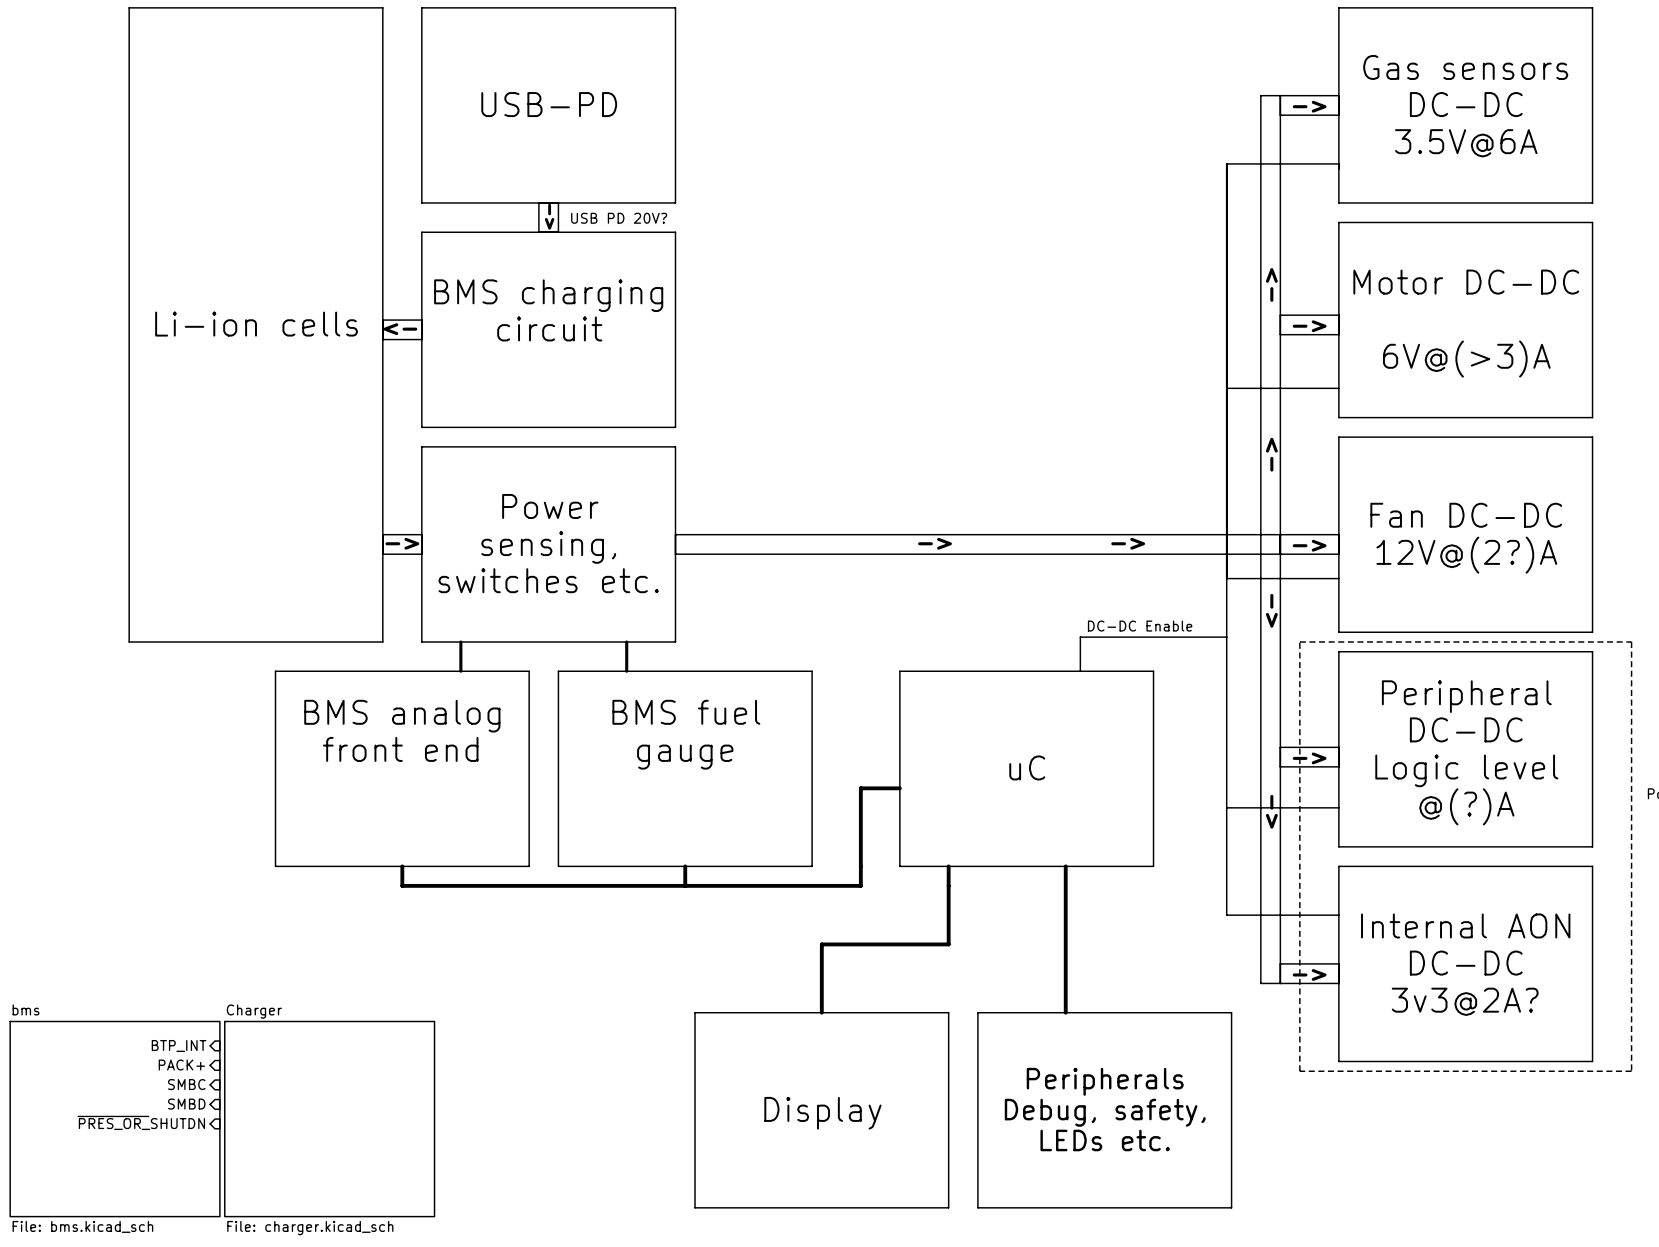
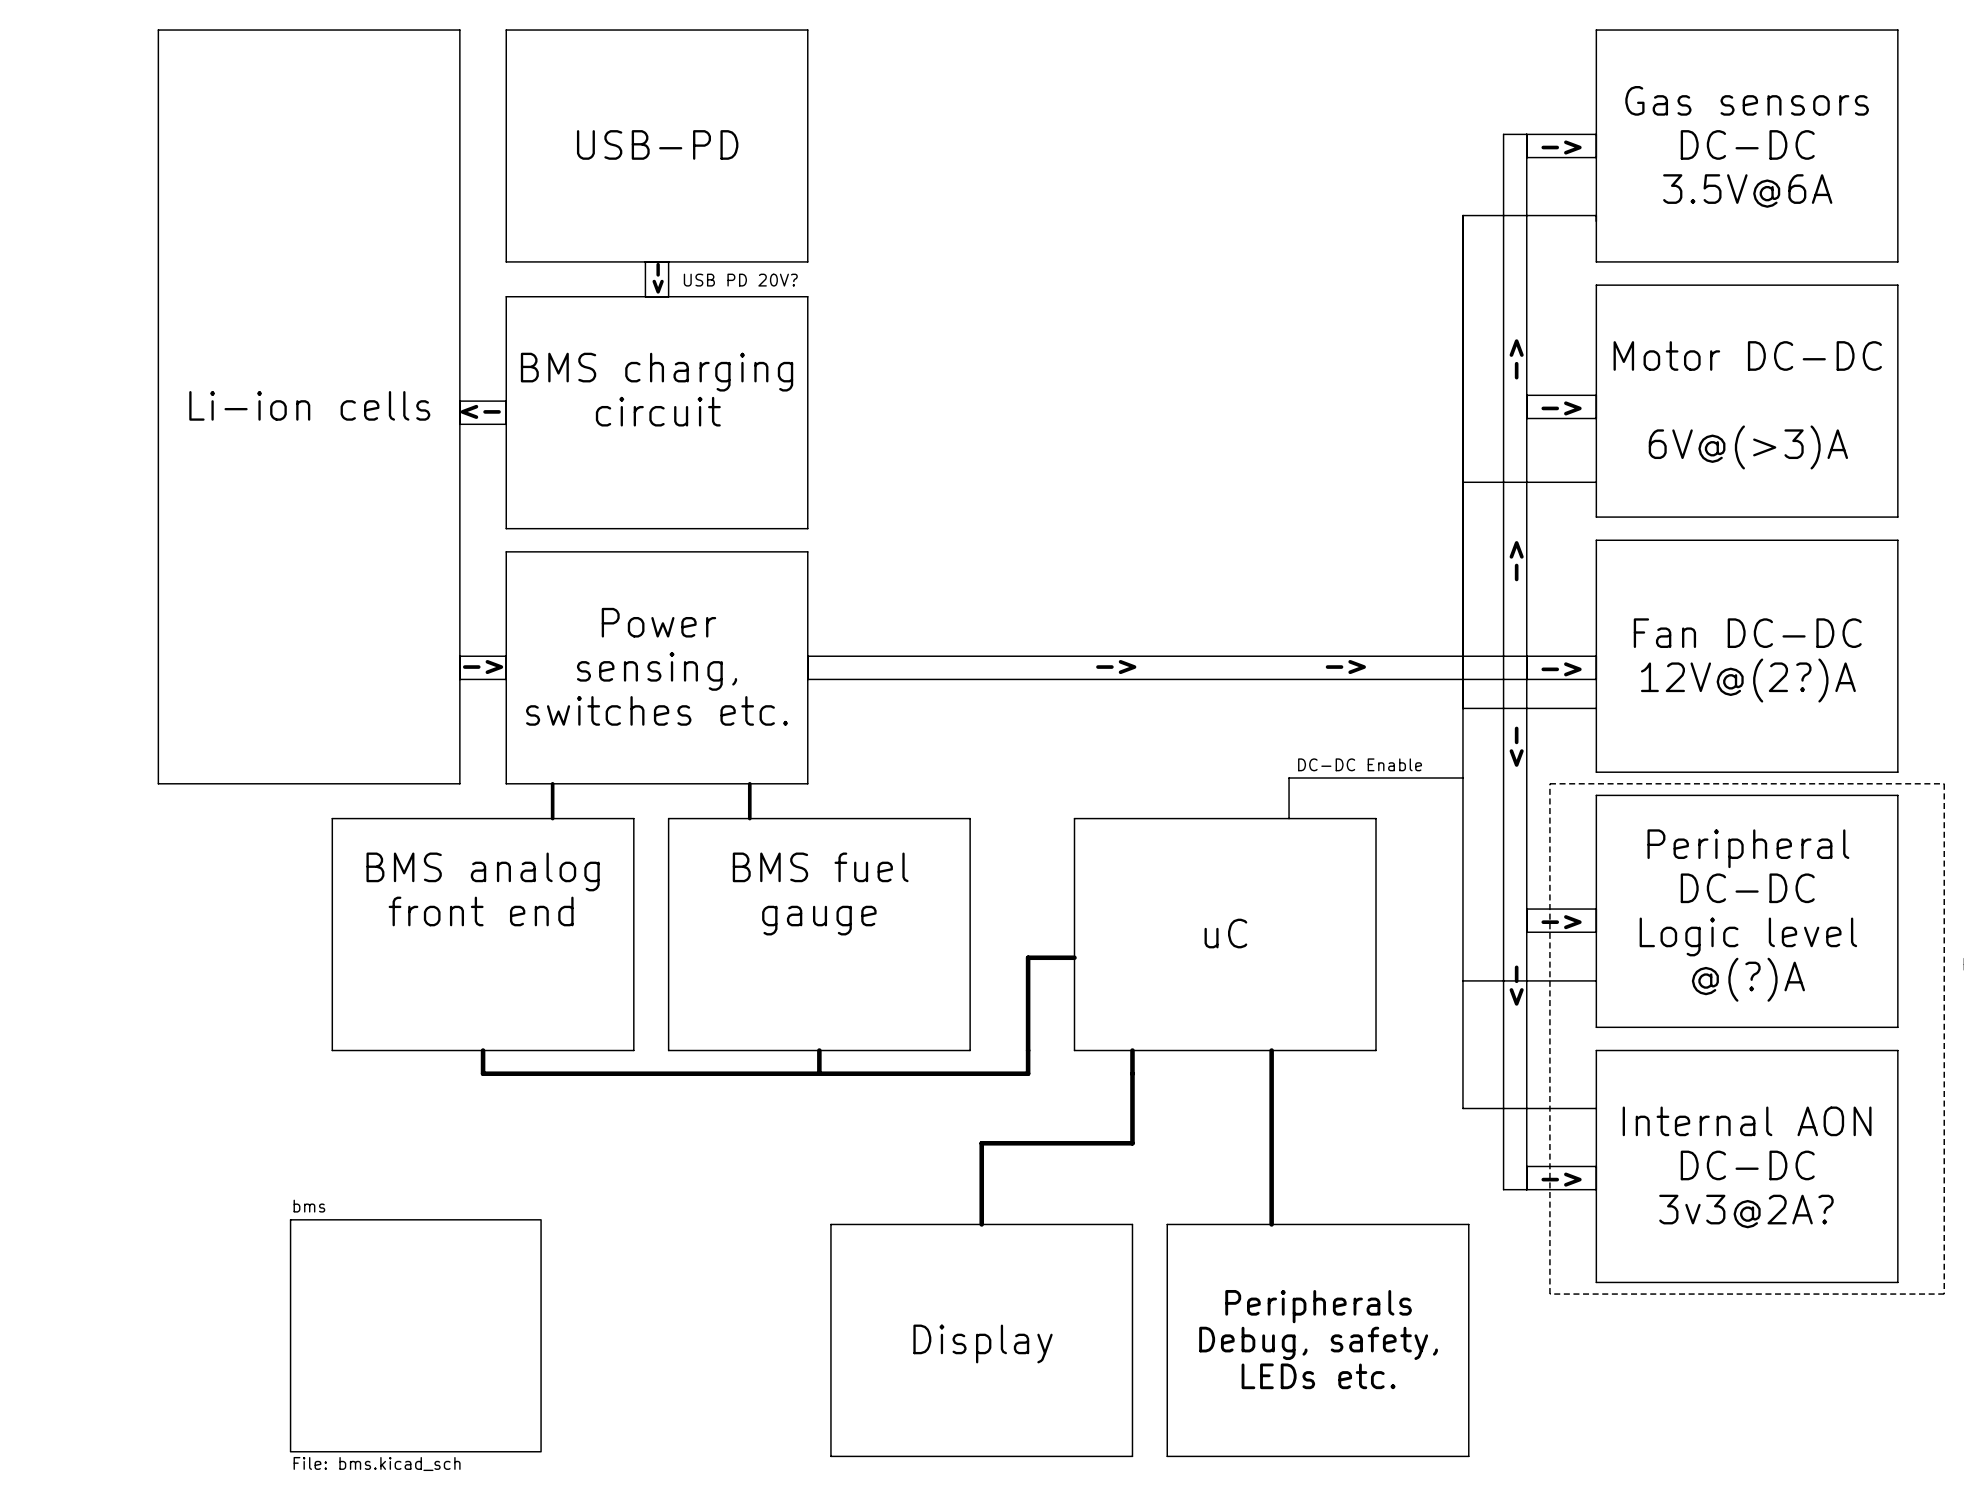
sheet pin: BTP_INT (179, 1045) -> none
sheet pin: PACK+ (181, 1065) -> none
sheet pin: SMBC (186, 1084) -> none
sheet pin: SMBD (186, 1104) -> none
sheet bms: none -> File: bms.kicad_sch (415, 1335)
sheet bms: File: bms.kicad_sch (115, 1119) -> none
sheet Charger: File: charger.kicad_sch (329, 1119) -> none
sheet pin: ~{PRES_OR_}SHUTDN (141, 1122) -> none

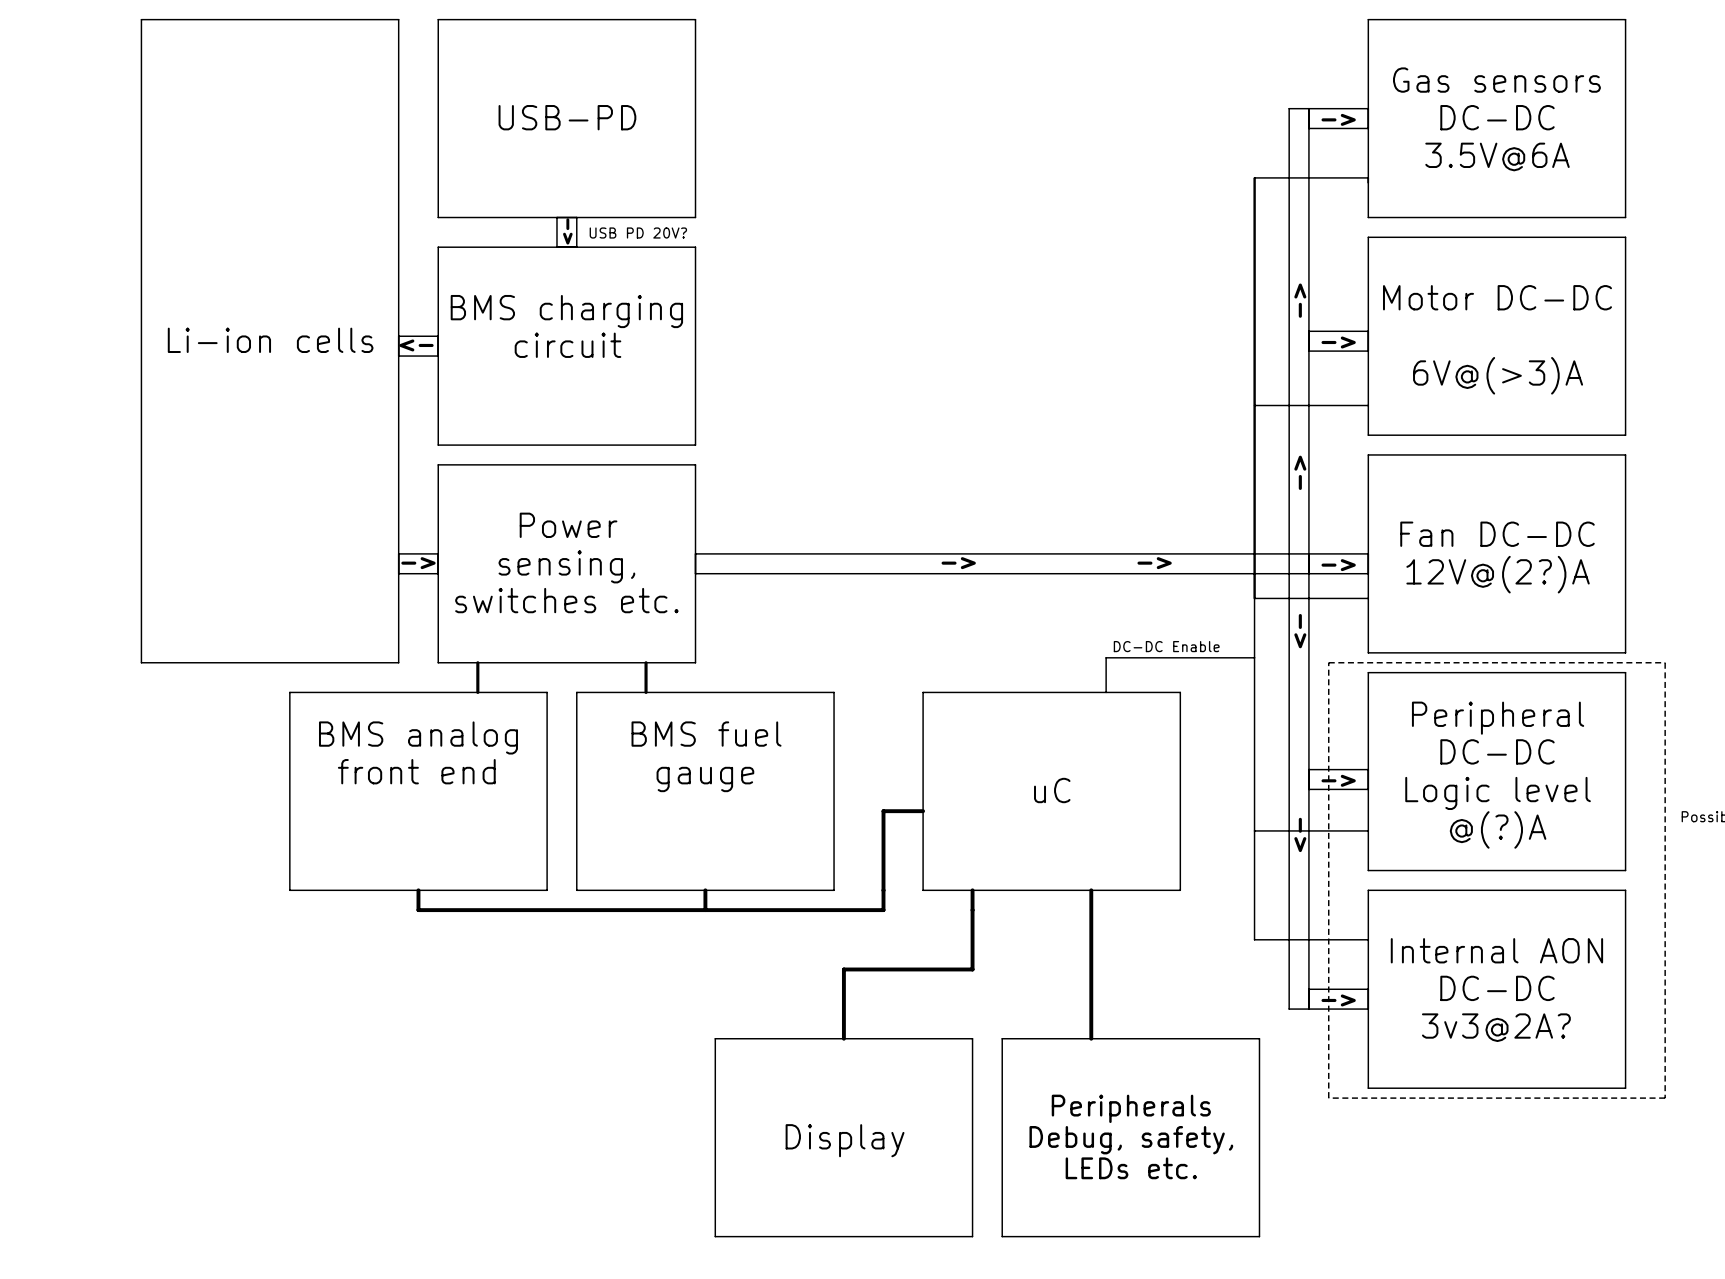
sheet bms: File: bms.kicad_sch (415, 1335) -> none

